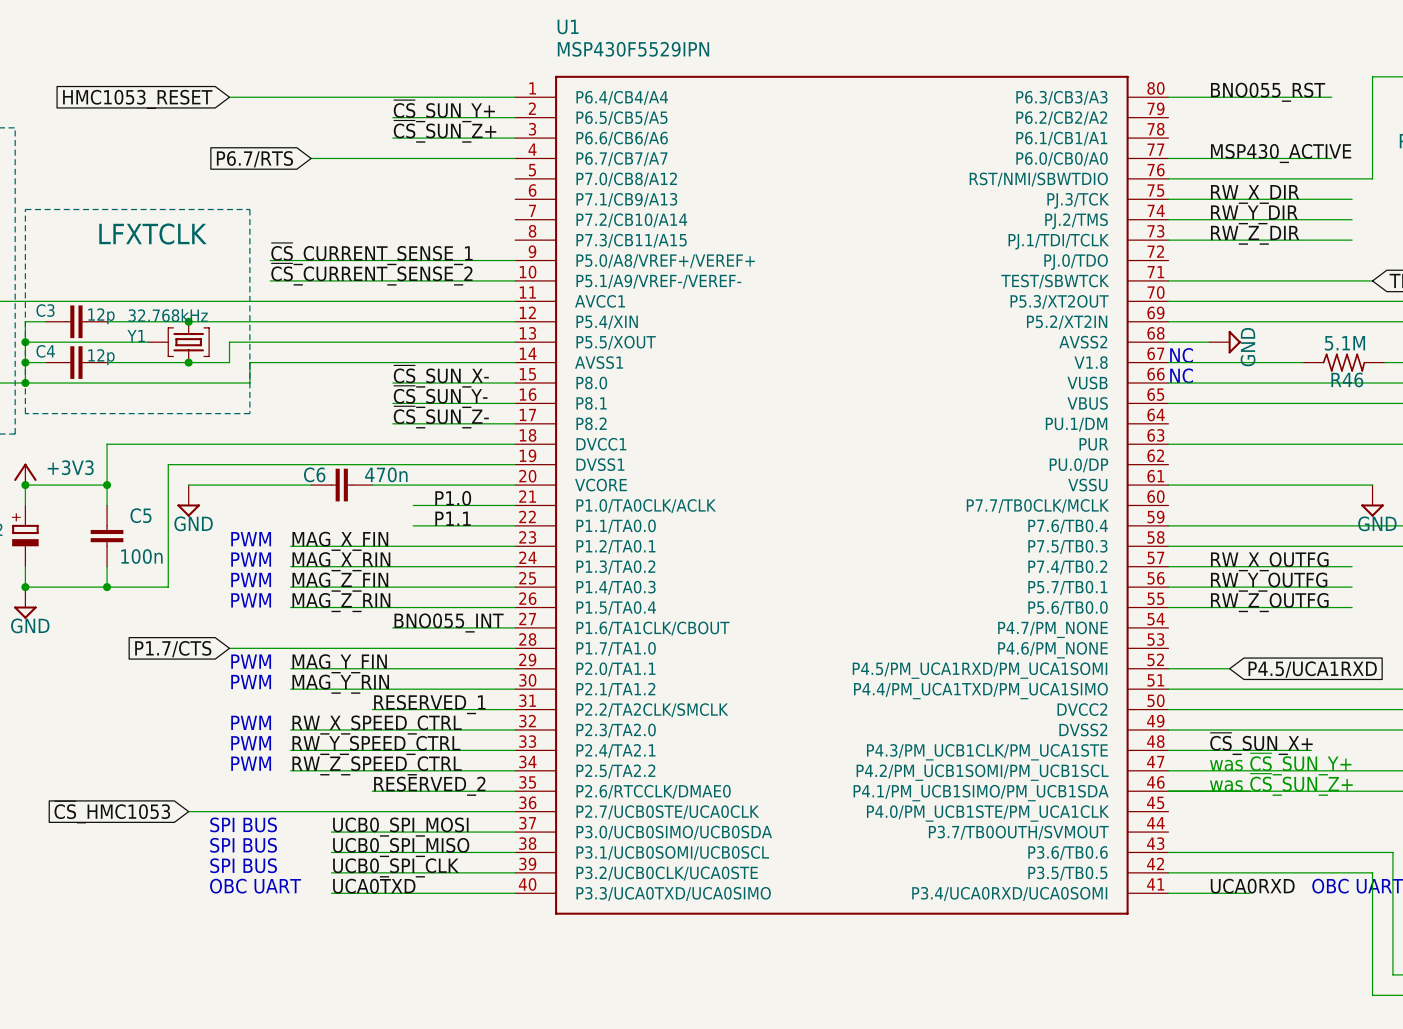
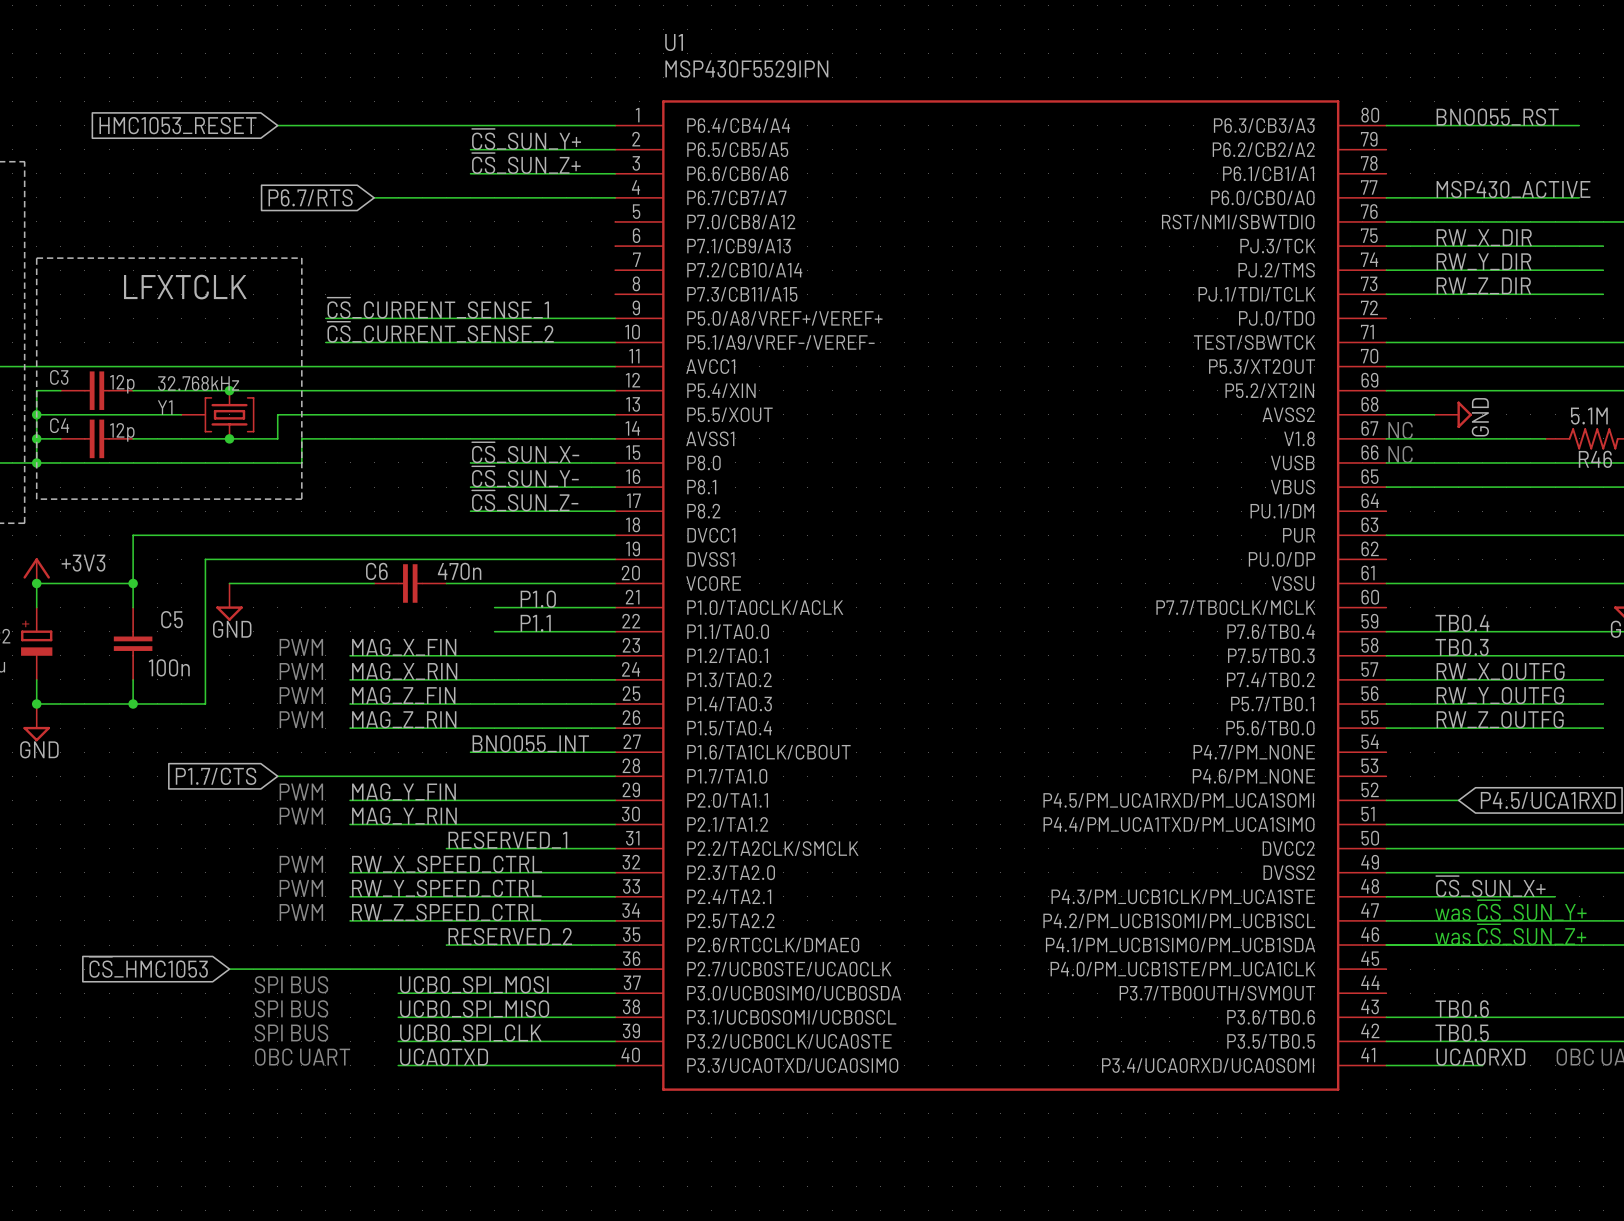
label: none -> TB0.4 (1462, 623)
label: none -> TB0.3 (1462, 647)
label: none -> TB0.6 (1462, 1008)
label: none -> TB0.5 (1462, 1032)

